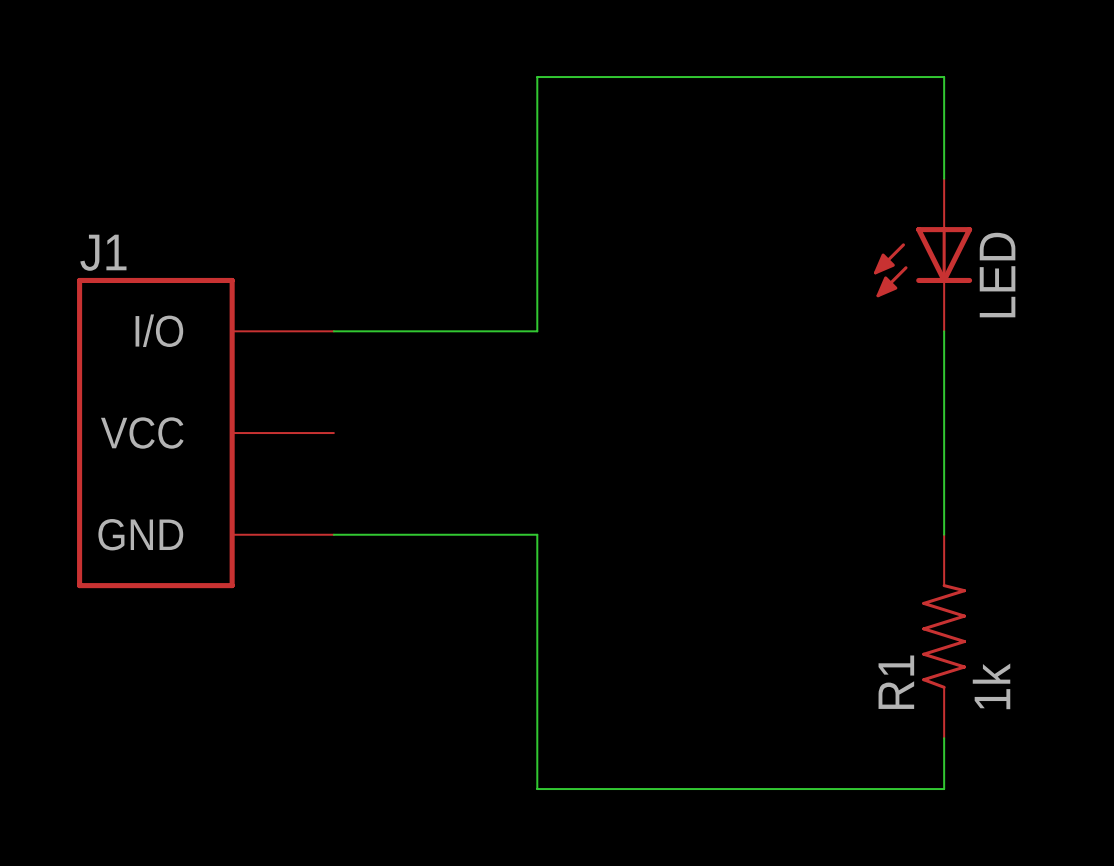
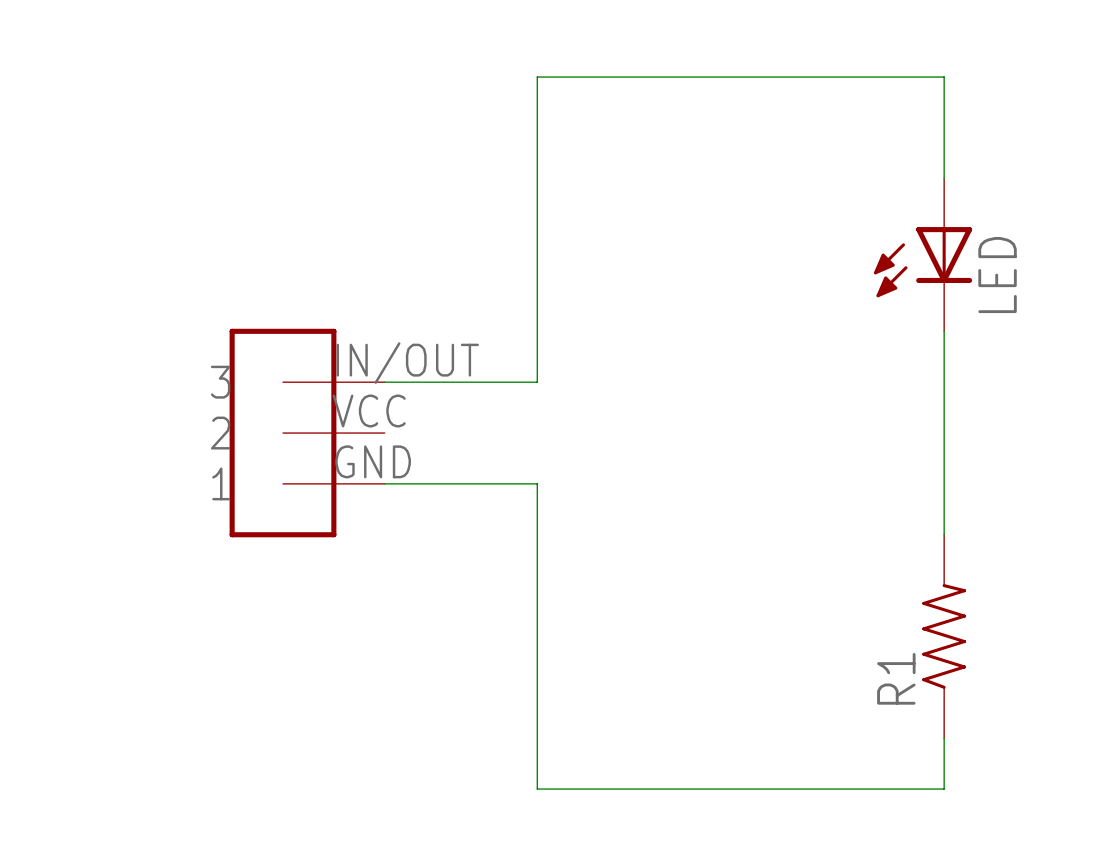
wire: (333, 331) (537, 331) -> (384, 382) (537, 382) (537, 331)
J1: (205, 433) -> none
part: none -> (307, 433)
wire: (333, 534) (537, 534) -> (384, 483) (537, 483) (537, 534)
R1 value: 1k (991, 686) -> none

